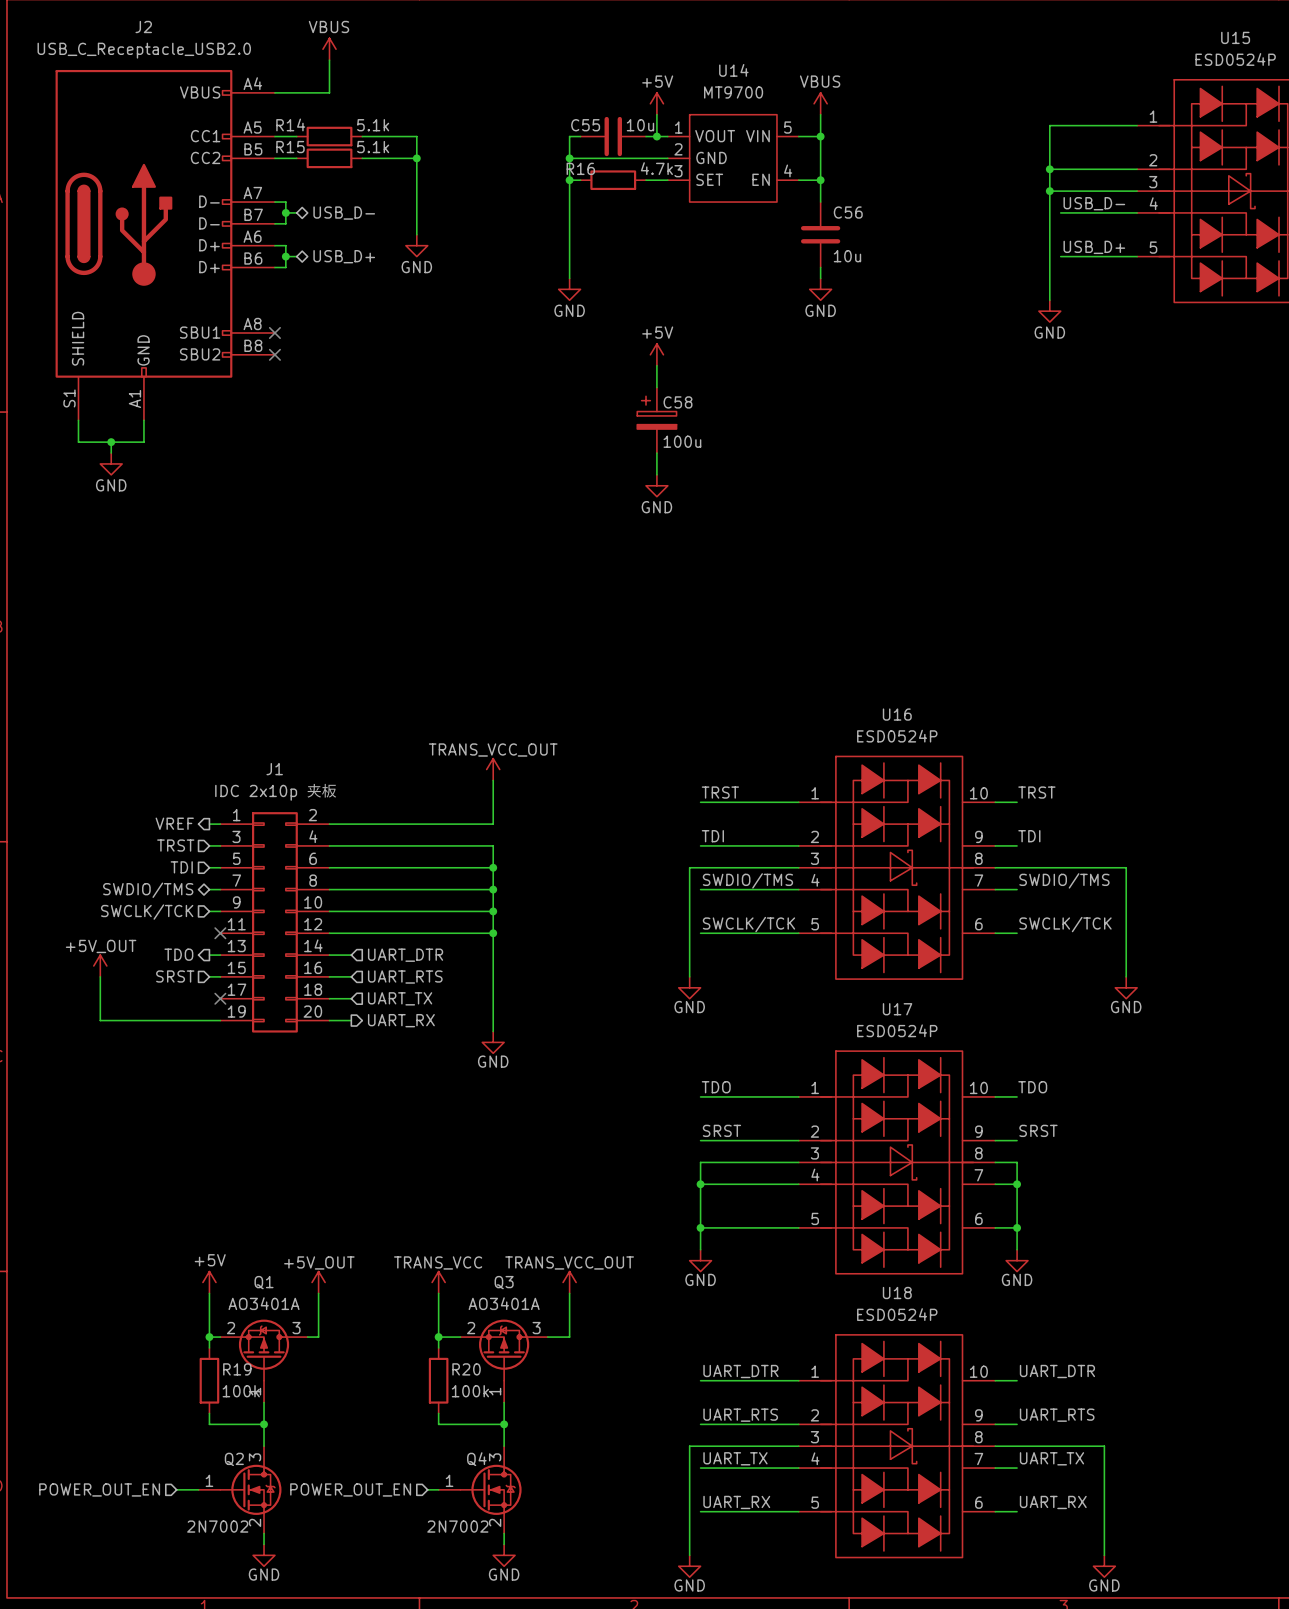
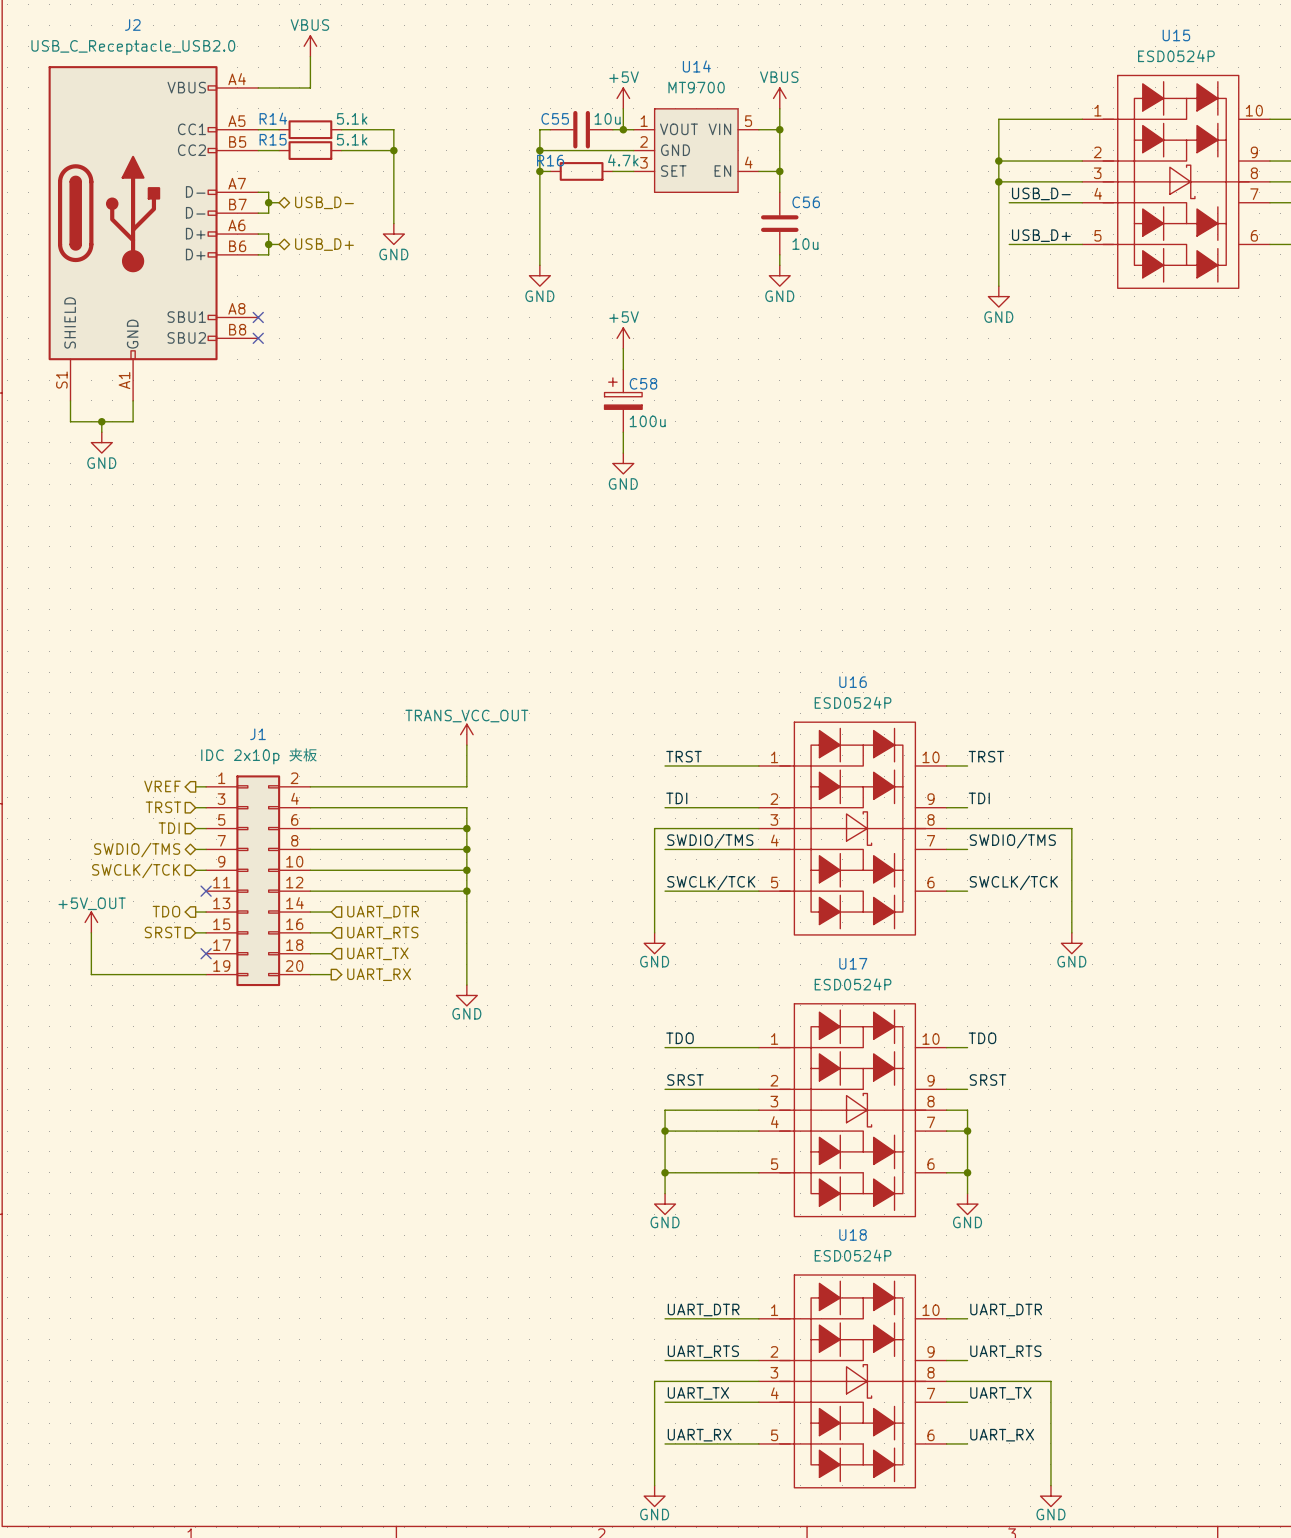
power symbol: +5V (209, 1282) -> none
power symbol: +5V_OUT (318, 1282) -> none
power symbol: TRANS_VCC (438, 1282) -> none
power symbol: TRANS_VCC_OUT (569, 1282) -> none
wire: (209, 1293) (209, 1347) -> none
wire: (318, 1293) (318, 1337) (307, 1337) -> none
wire: (438, 1293) (438, 1347) -> none
wire: (569, 1293) (569, 1337) (547, 1337) -> none
wire: (209, 1337) (220, 1337) -> none
junction: (209, 1337) -> none
wire: (438, 1337) (460, 1337) -> none
junction: (438, 1337) -> none
Q1: AO3401A (264, 1361) -> none
Q3: AO3401A (504, 1361) -> none
R19: 100k (209, 1380) -> none
R20: 100k (438, 1380) -> none
wire: (264, 1402) (264, 1446) -> none
wire: (504, 1402) (504, 1446) -> none
wire: (209, 1413) (209, 1424) (264, 1424) -> none
wire: (438, 1413) (438, 1424) (504, 1424) -> none
junction: (264, 1424) -> none
junction: (504, 1424) -> none
hierarchical label: POWER_OUT_EN (99, 1489) -> none
wire: (176, 1489) (198, 1489) -> none
Q2: 2N7002 (240, 1489) -> none
hierarchical label: POWER_OUT_EN (350, 1489) -> none
wire: (427, 1489) (438, 1489) -> none
Q4: 2N7002 (480, 1489) -> none
wire: (264, 1533) (264, 1544) -> none
wire: (504, 1533) (504, 1544) -> none
power symbol: GND (264, 1555) -> none
power symbol: GND (504, 1555) -> none

